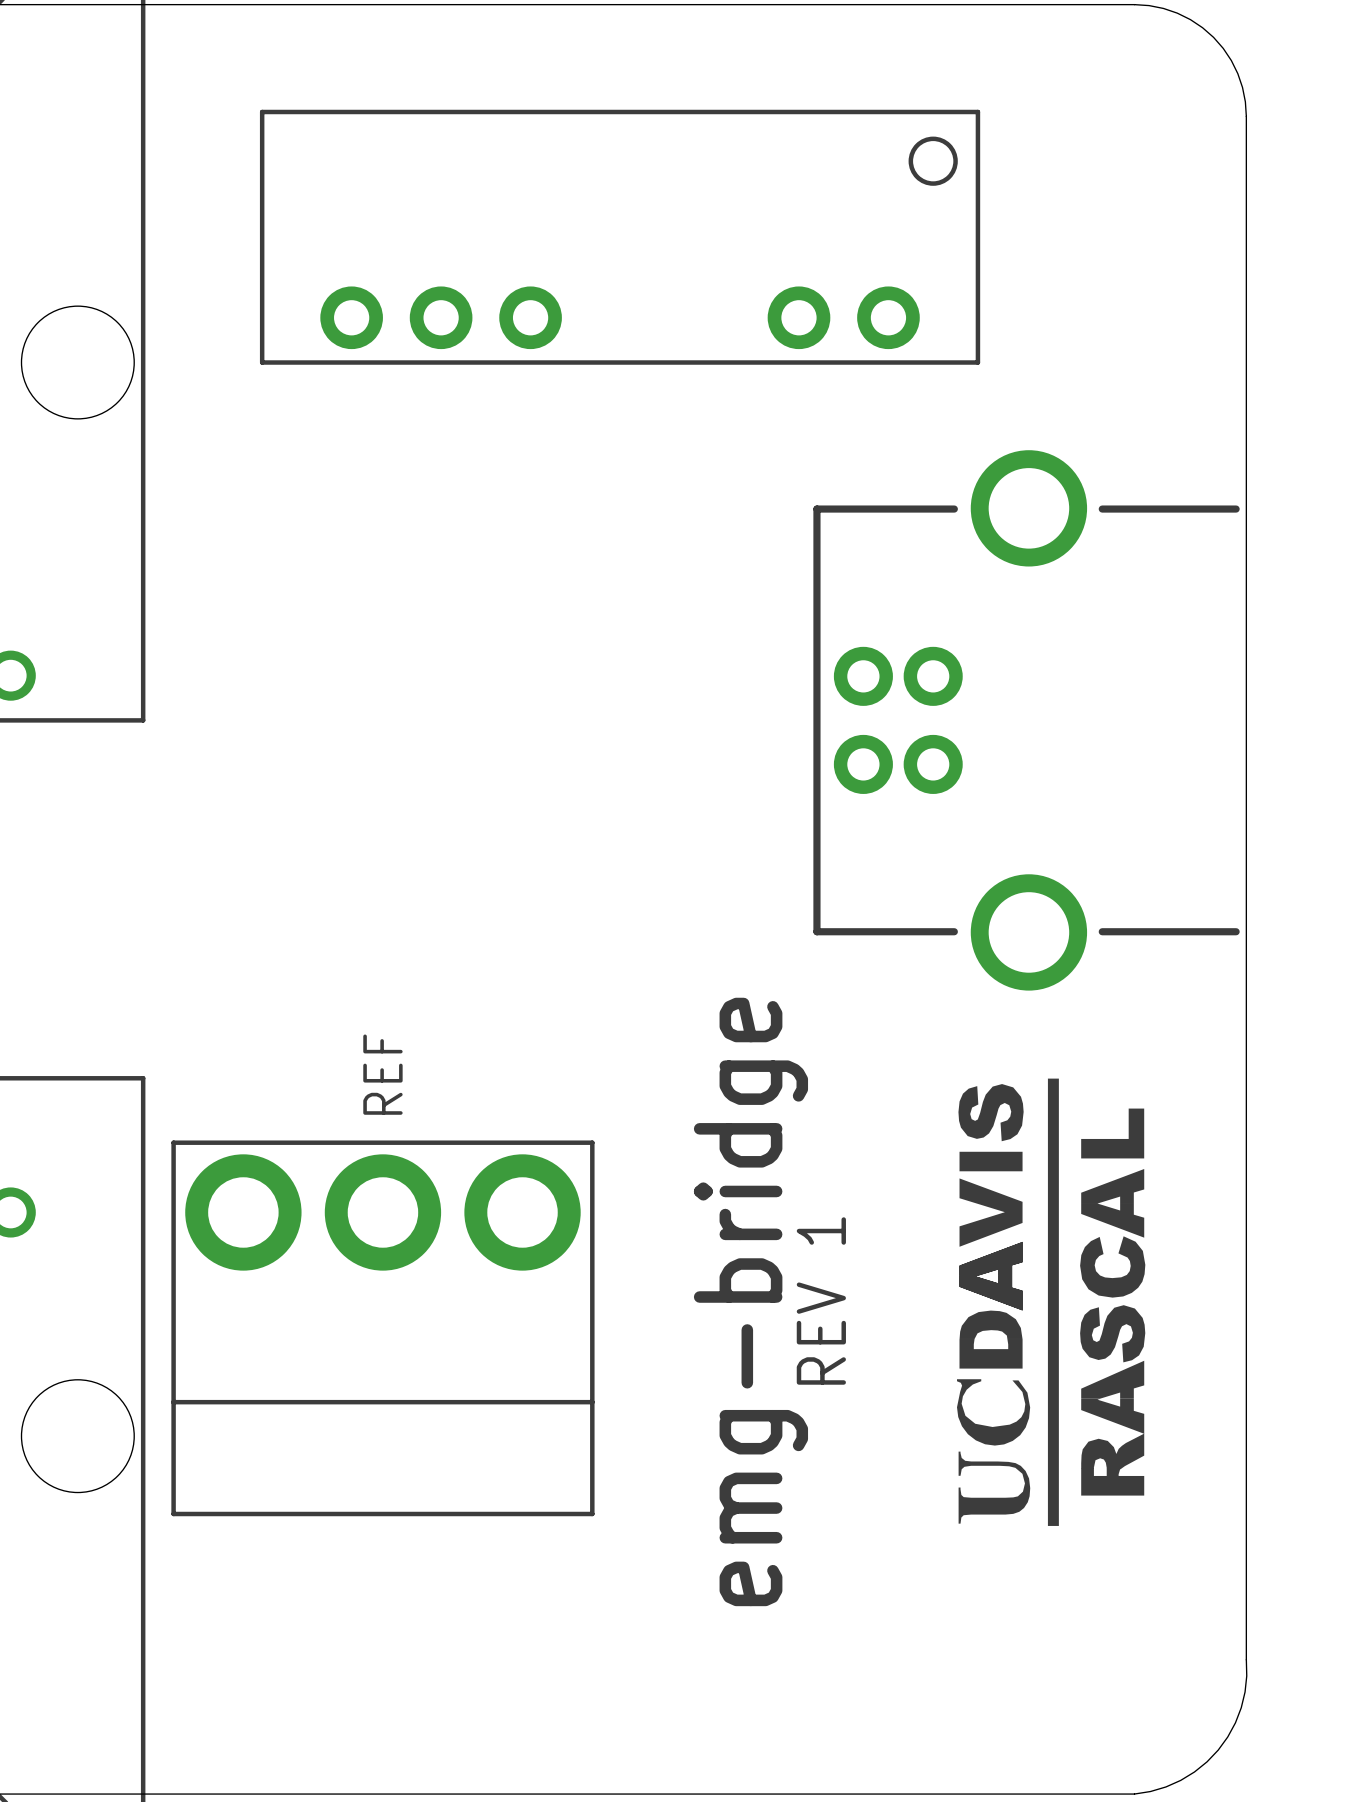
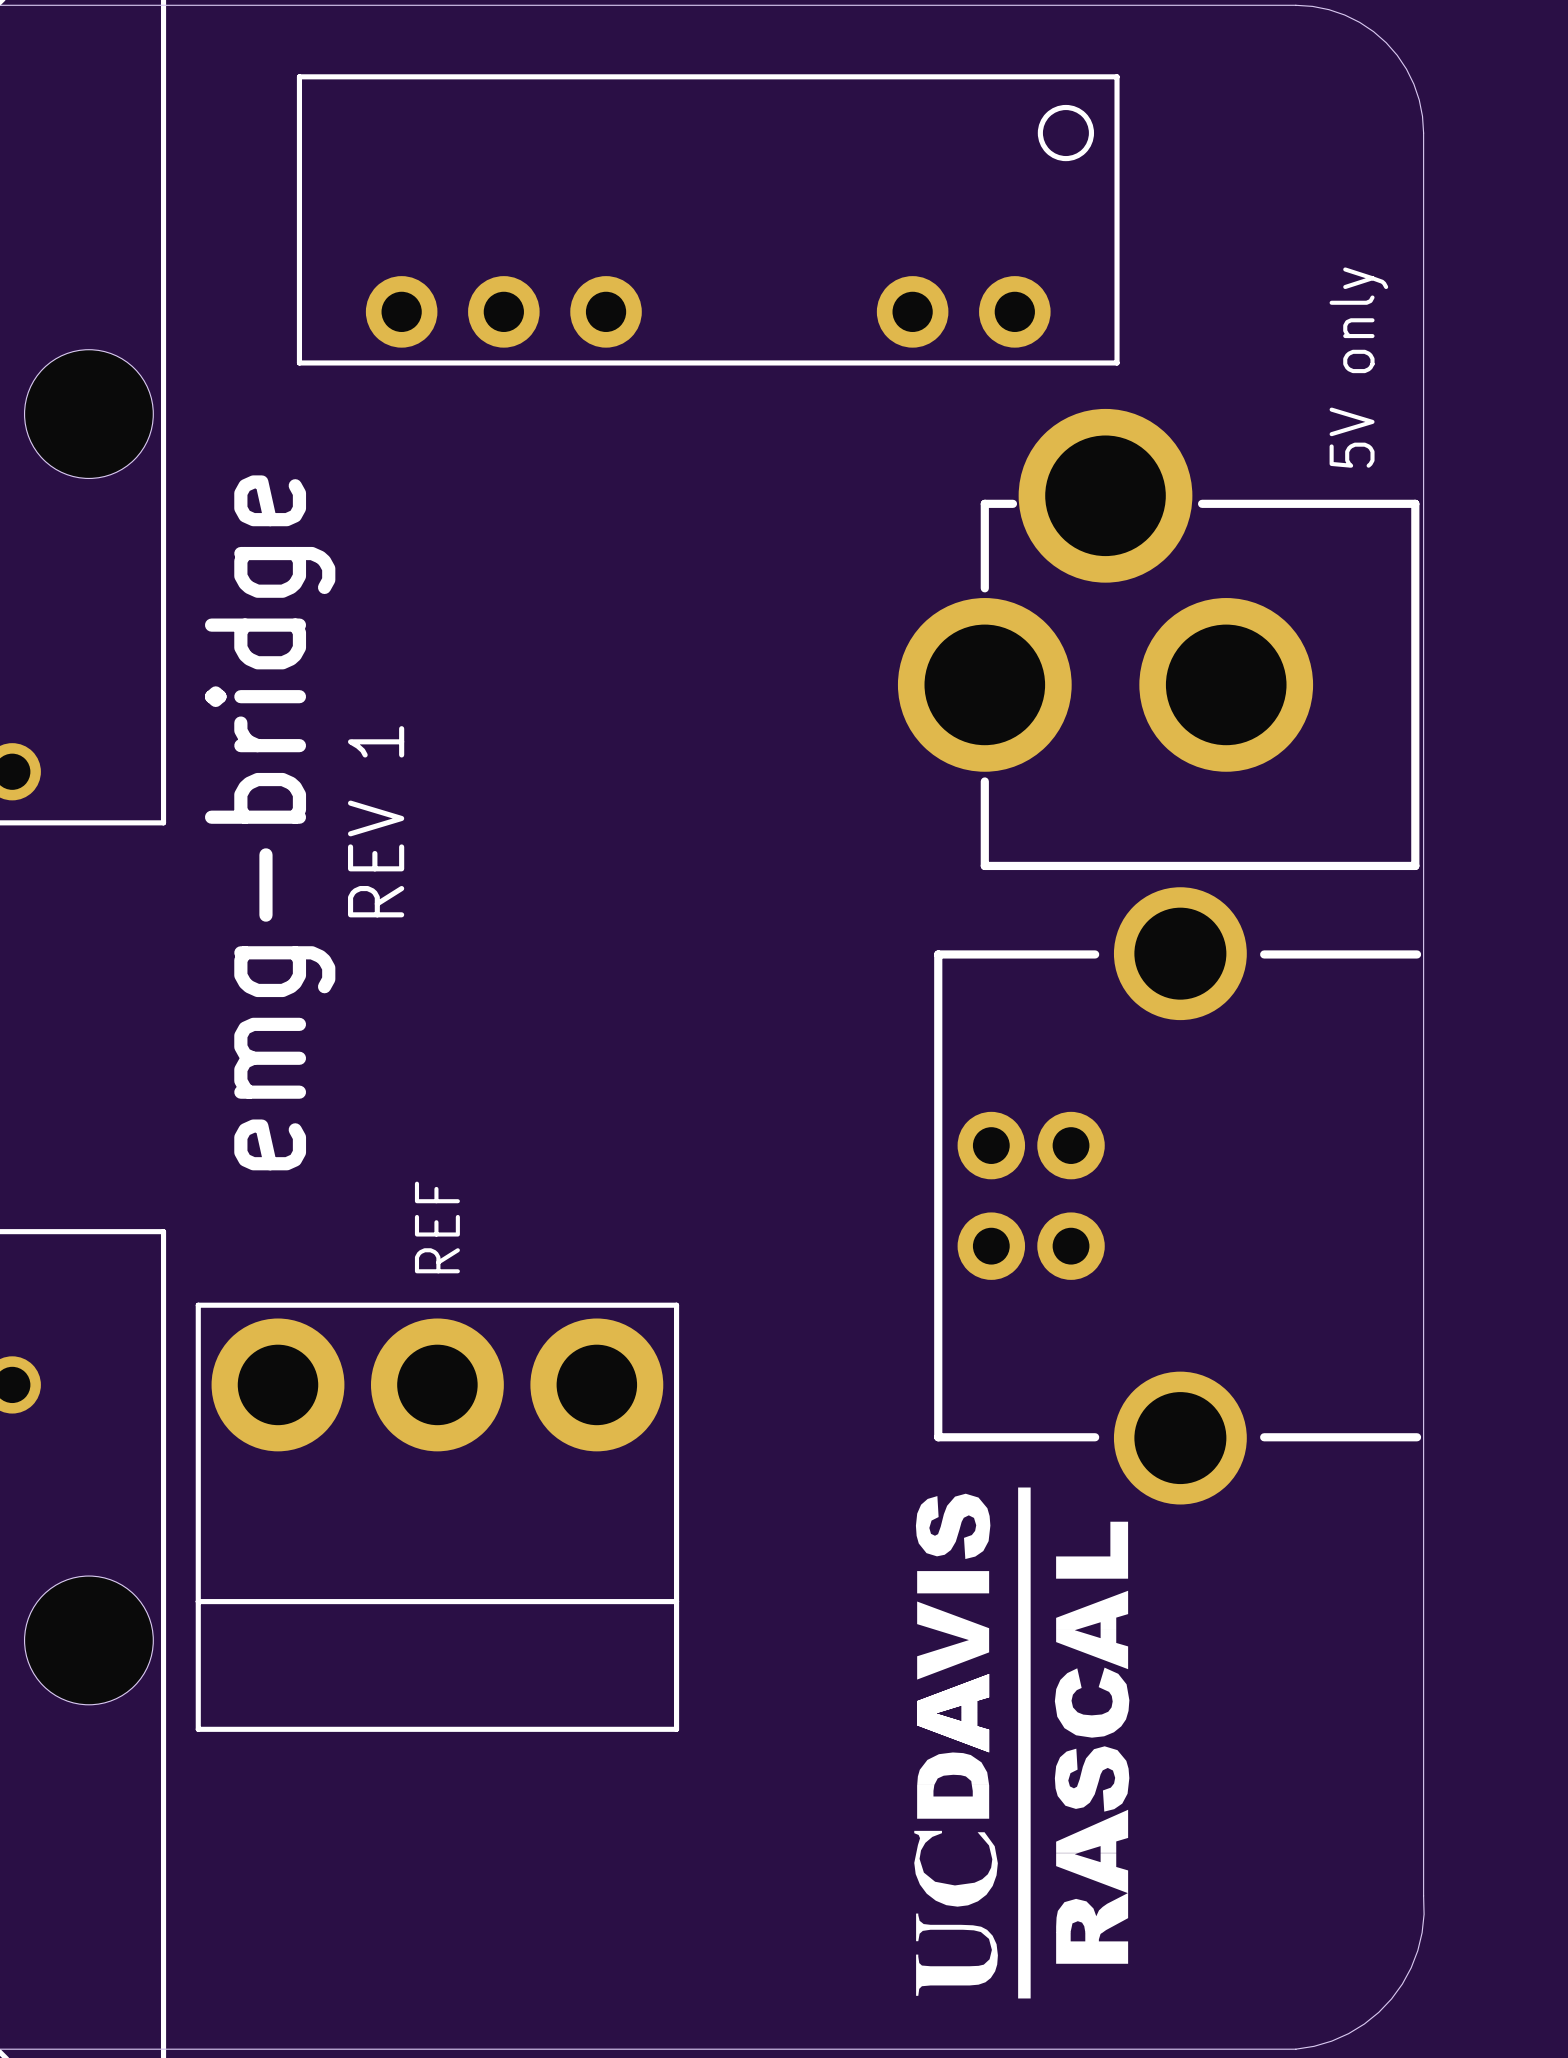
part position: (620, 237) -> (708, 219)
text: none -> 5V only (1358, 367)
part: none -> (1158, 639)
part position: (1026, 720) -> (1177, 1195)
drawing: [957, 1078, 1146, 1526] -> none
text position: REV 1 (821, 1300) -> REV 1 (376, 821)
text position: emg-bridge (750, 1301) -> emg-bridge (270, 822)
drawing: none -> [914, 1487, 1130, 1999]

